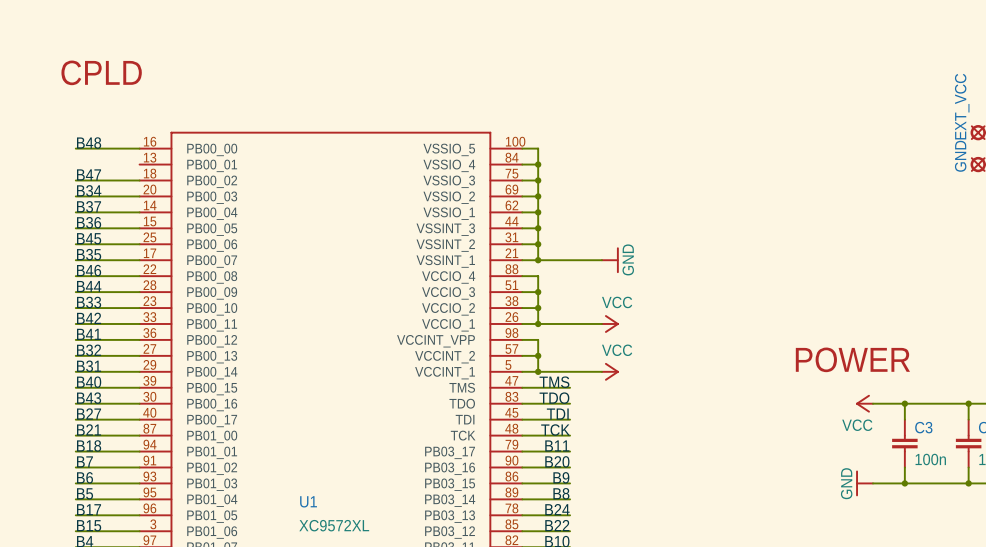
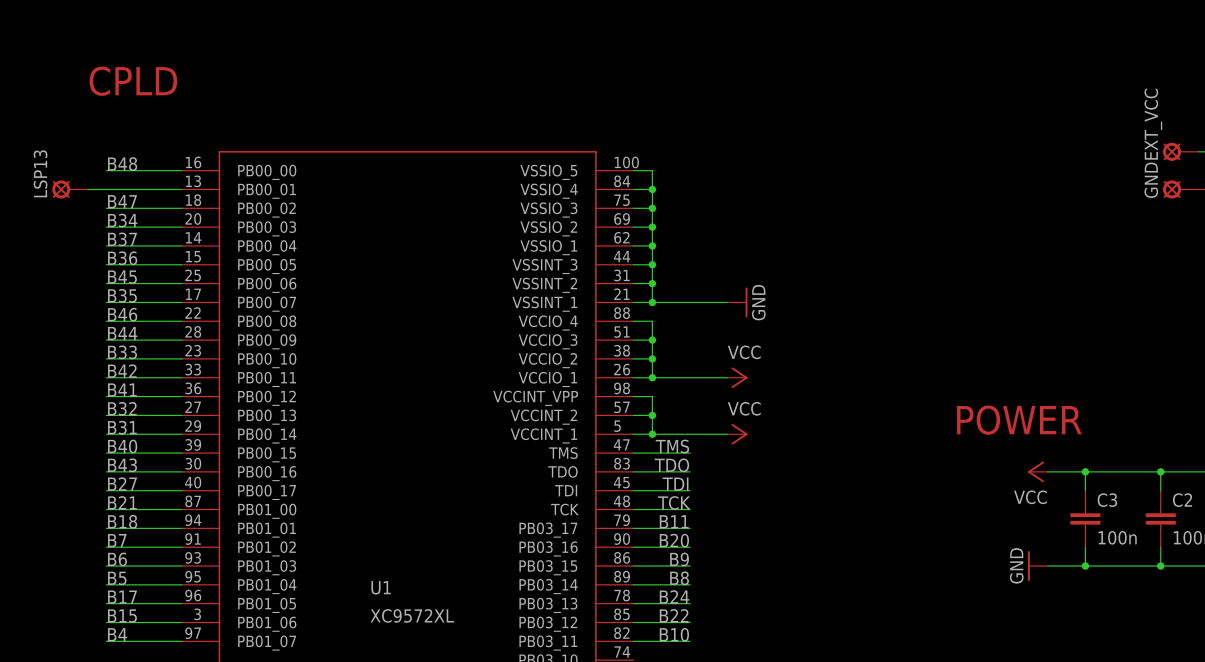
LSP13: none -> (69, 189)
wire: none -> (87, 189) (181, 189)

